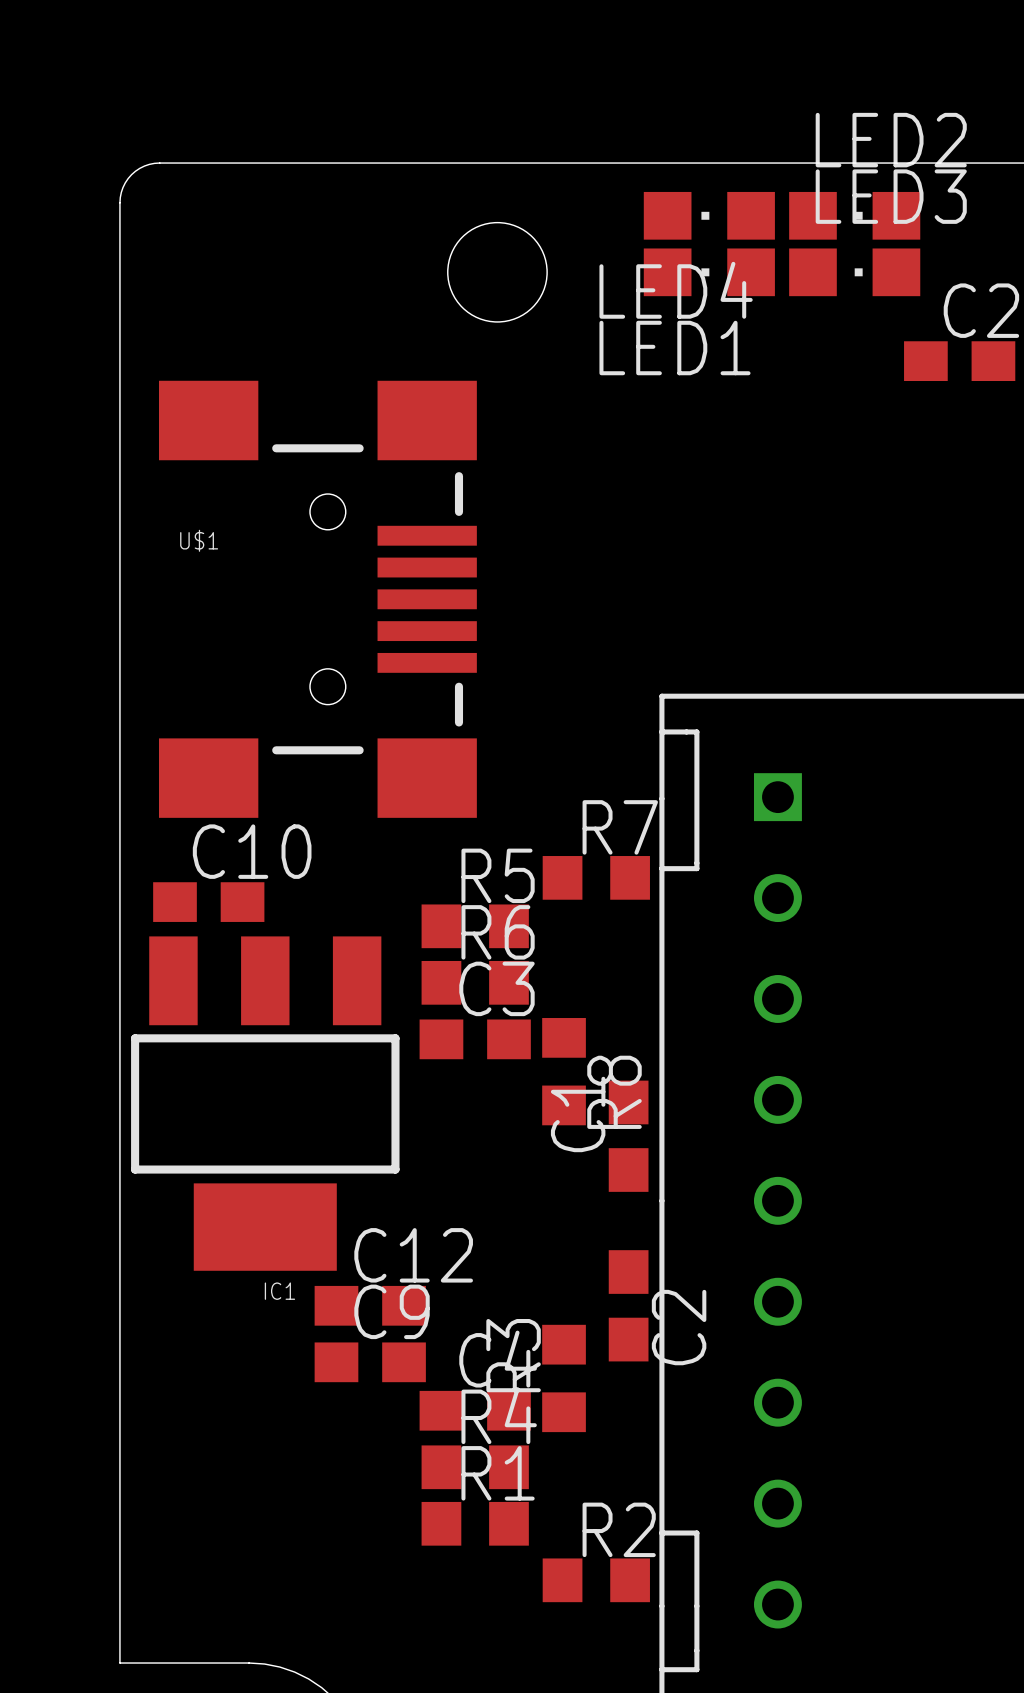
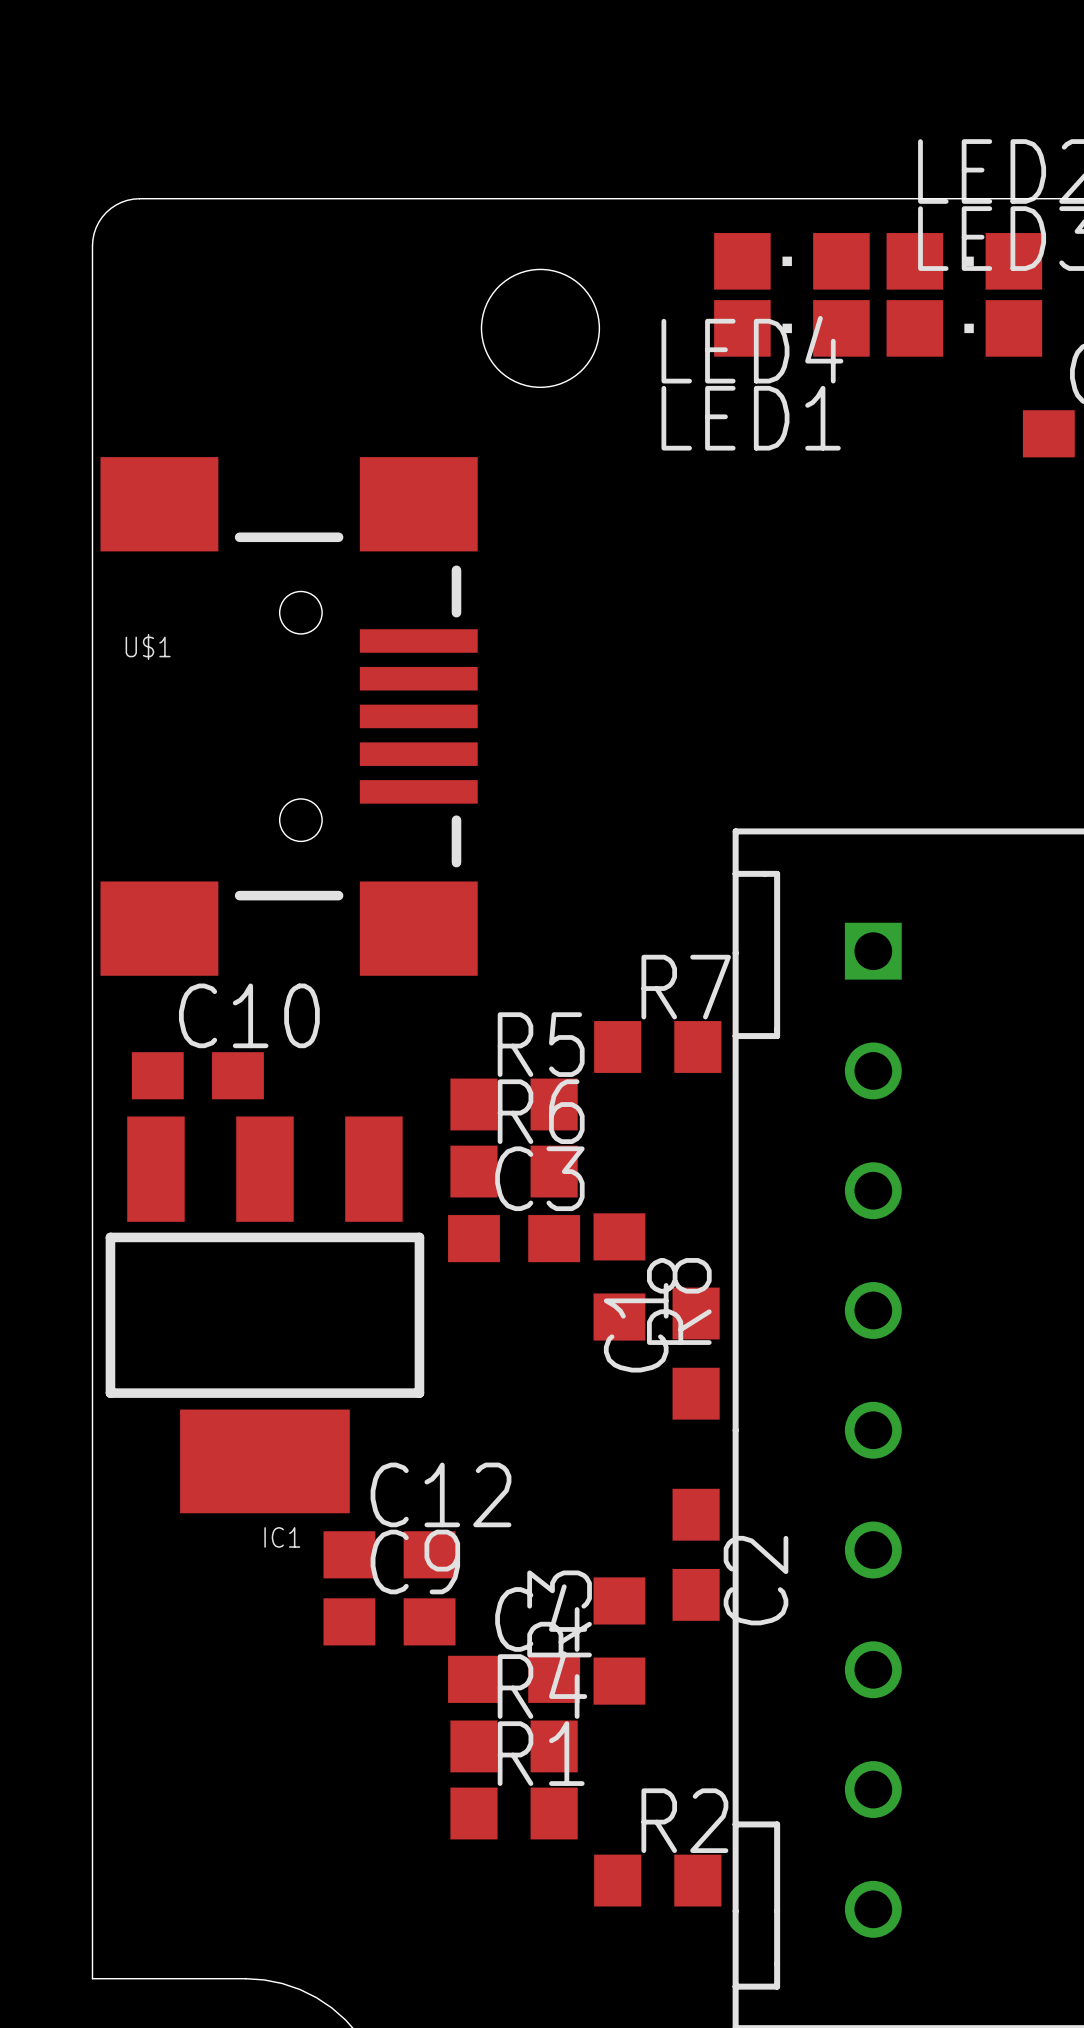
U$1 position: (317, 599) -> (289, 716)

